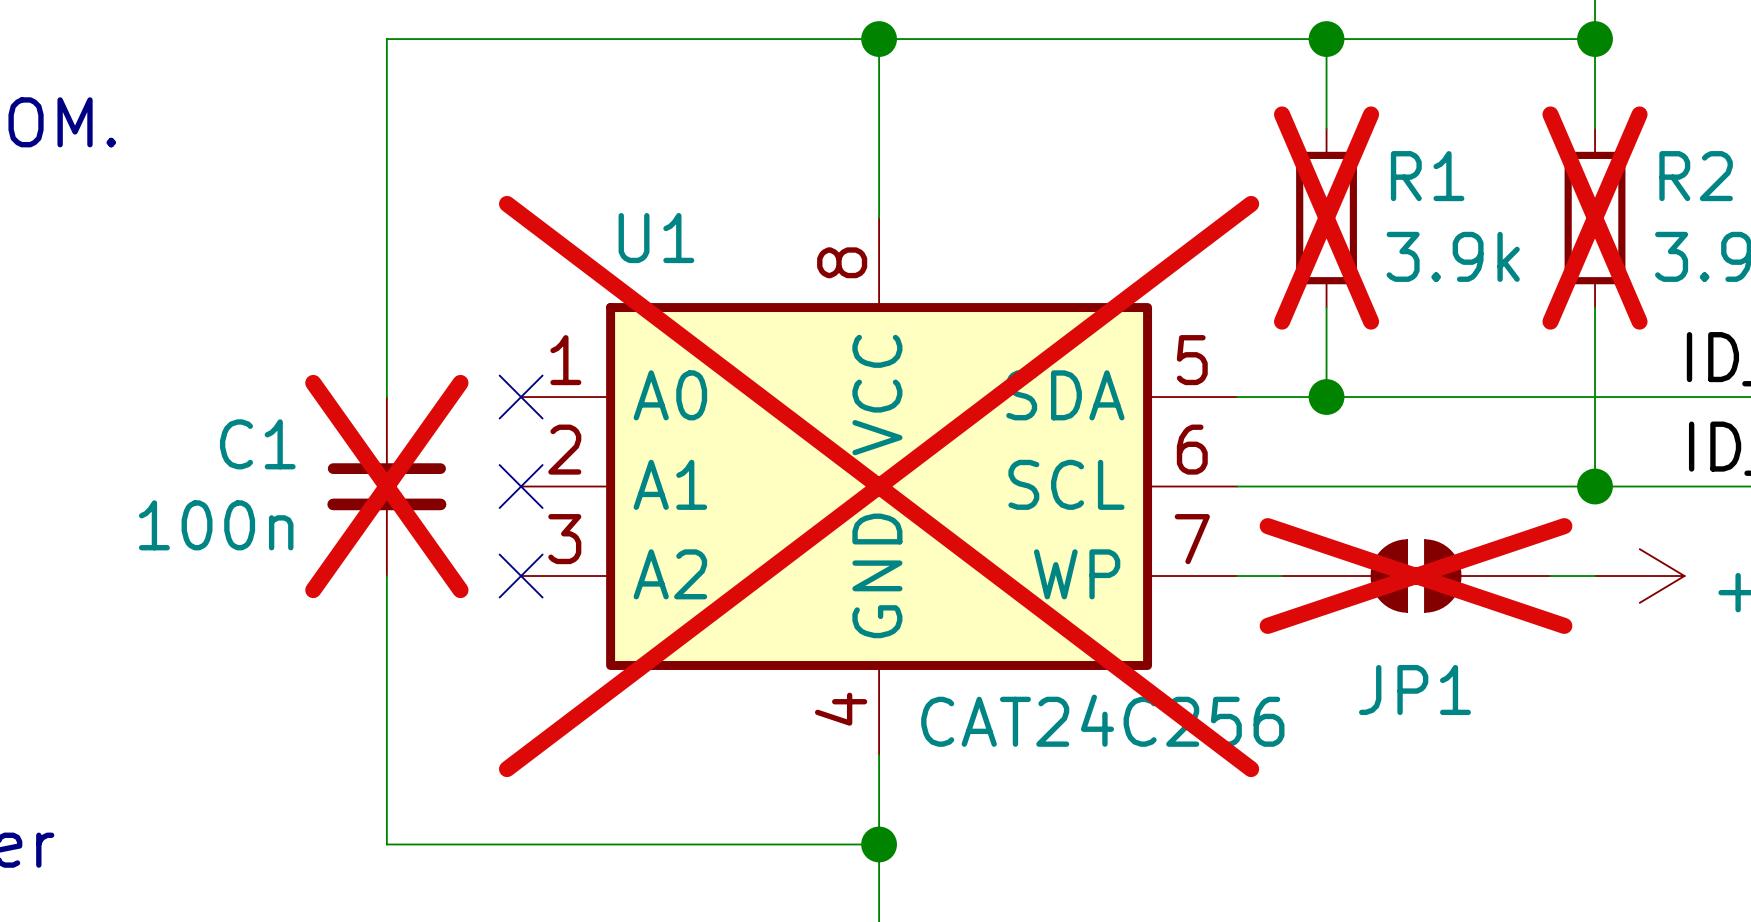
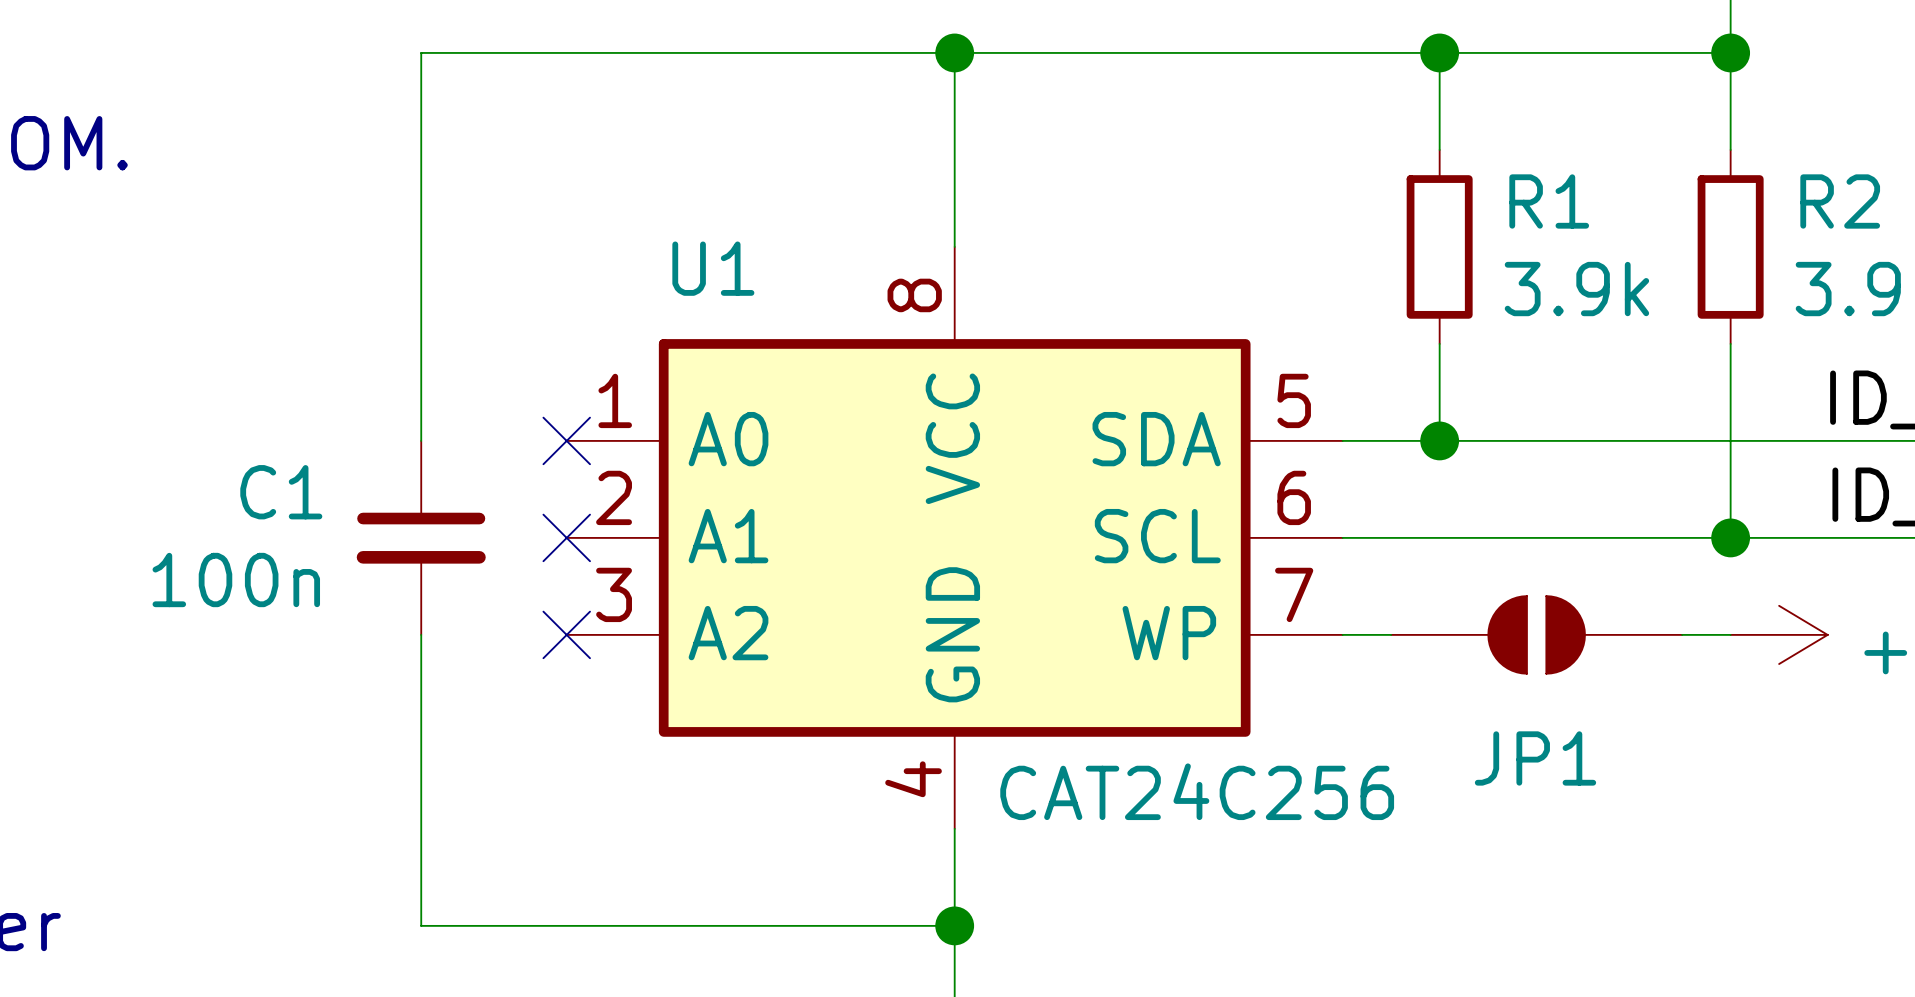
R1 do-not-place cross: (1326, 218) -> none
R2 do-not-place cross: (1595, 218) -> none
C1 do-not-place cross: (386, 486) -> none
U1 do-not-place cross: (879, 486) -> none
JP1 do-not-place cross: (1416, 576) -> none

